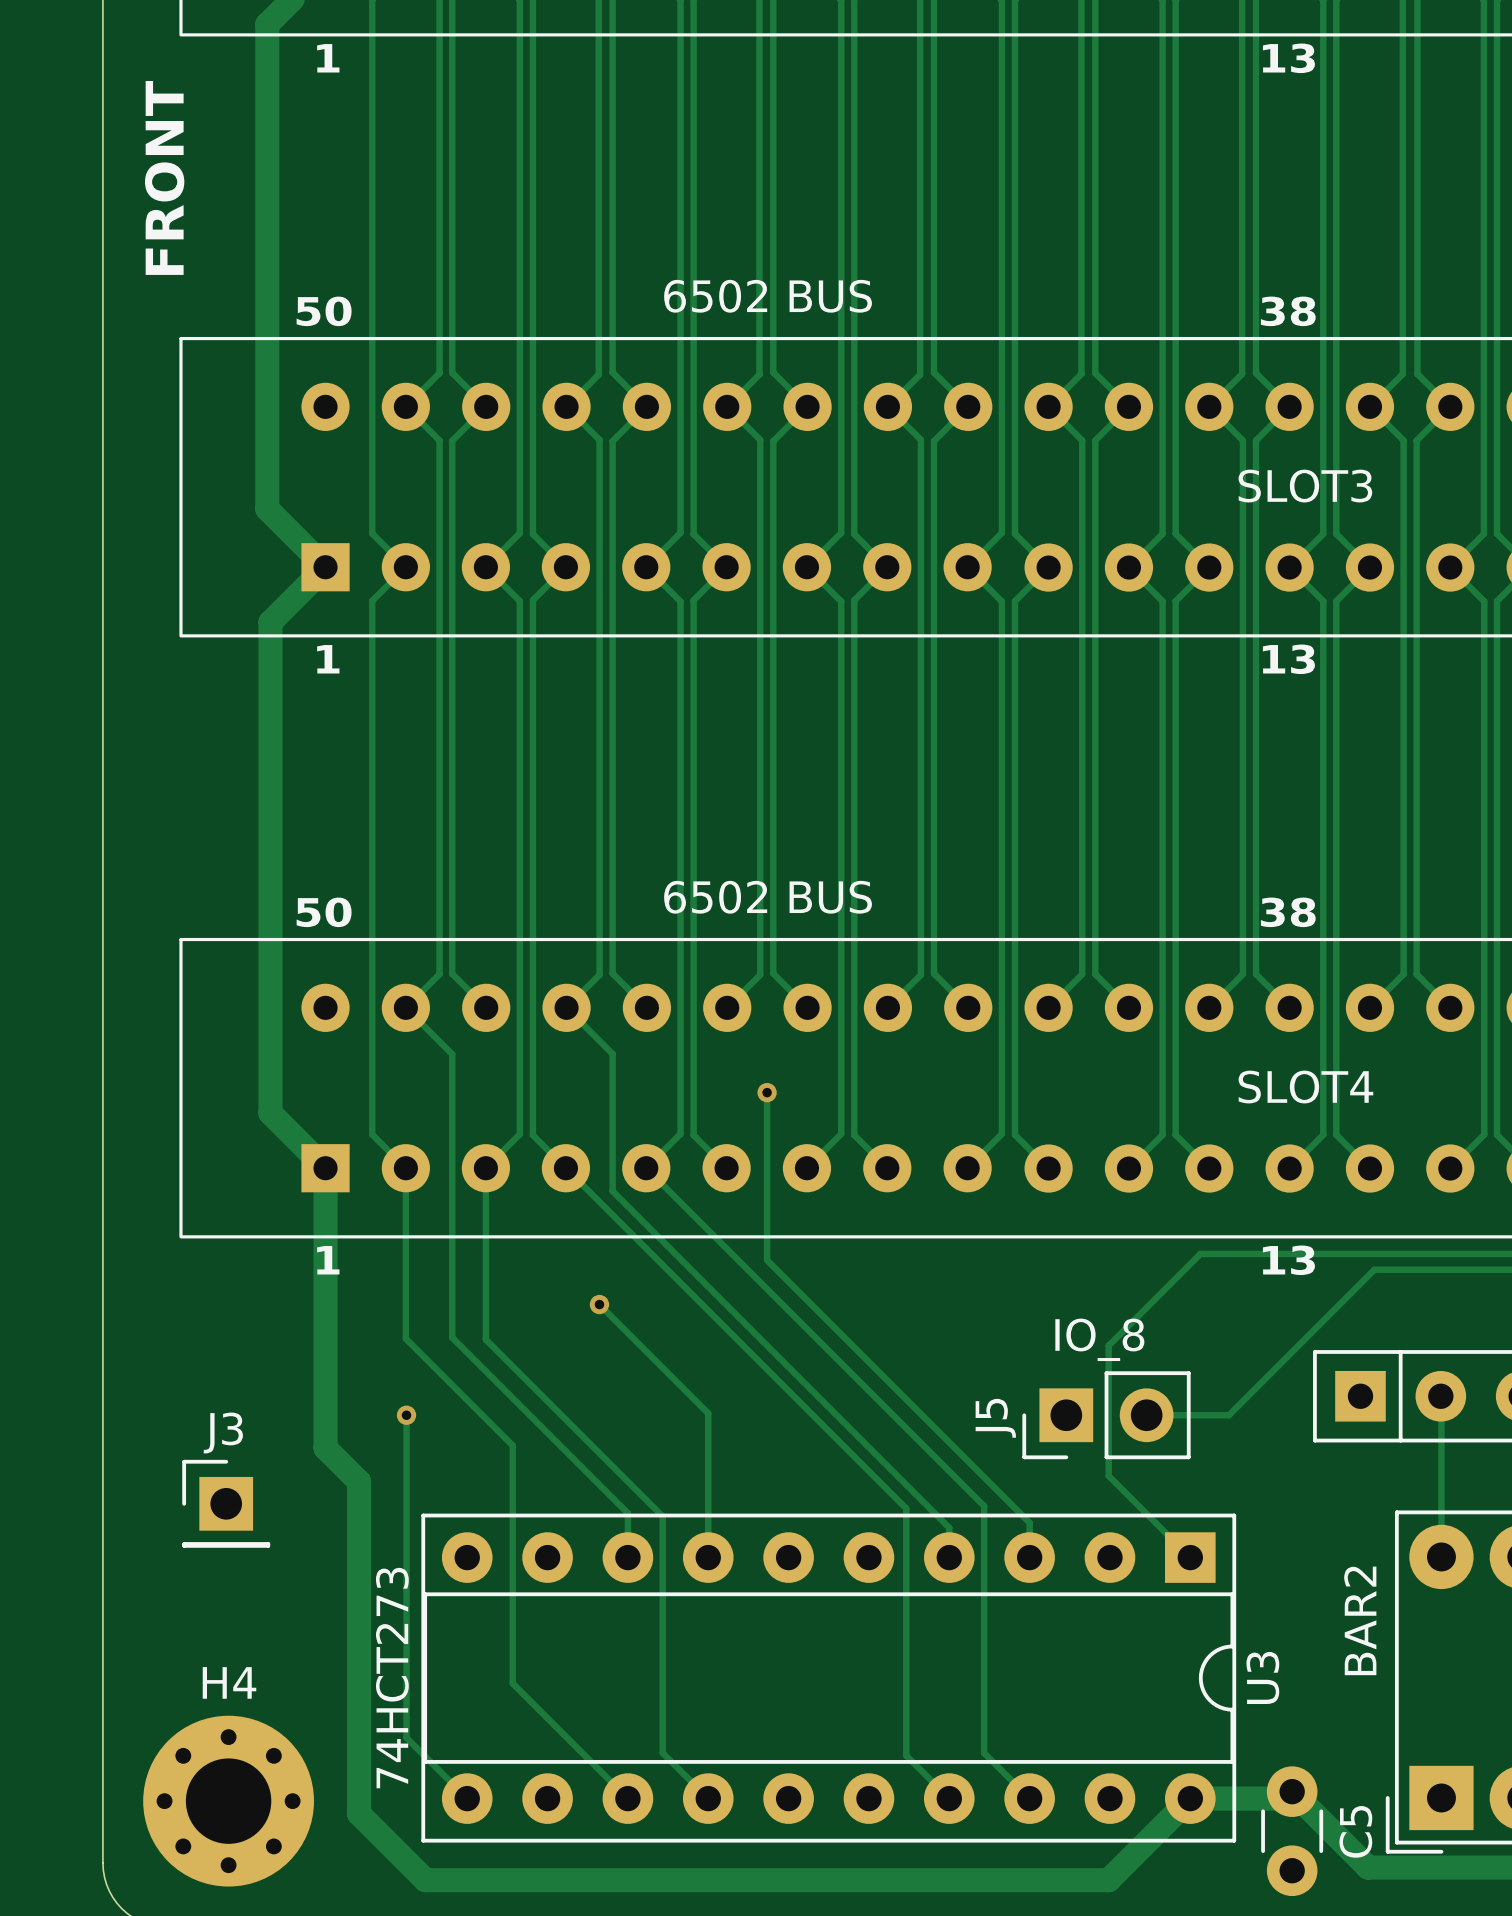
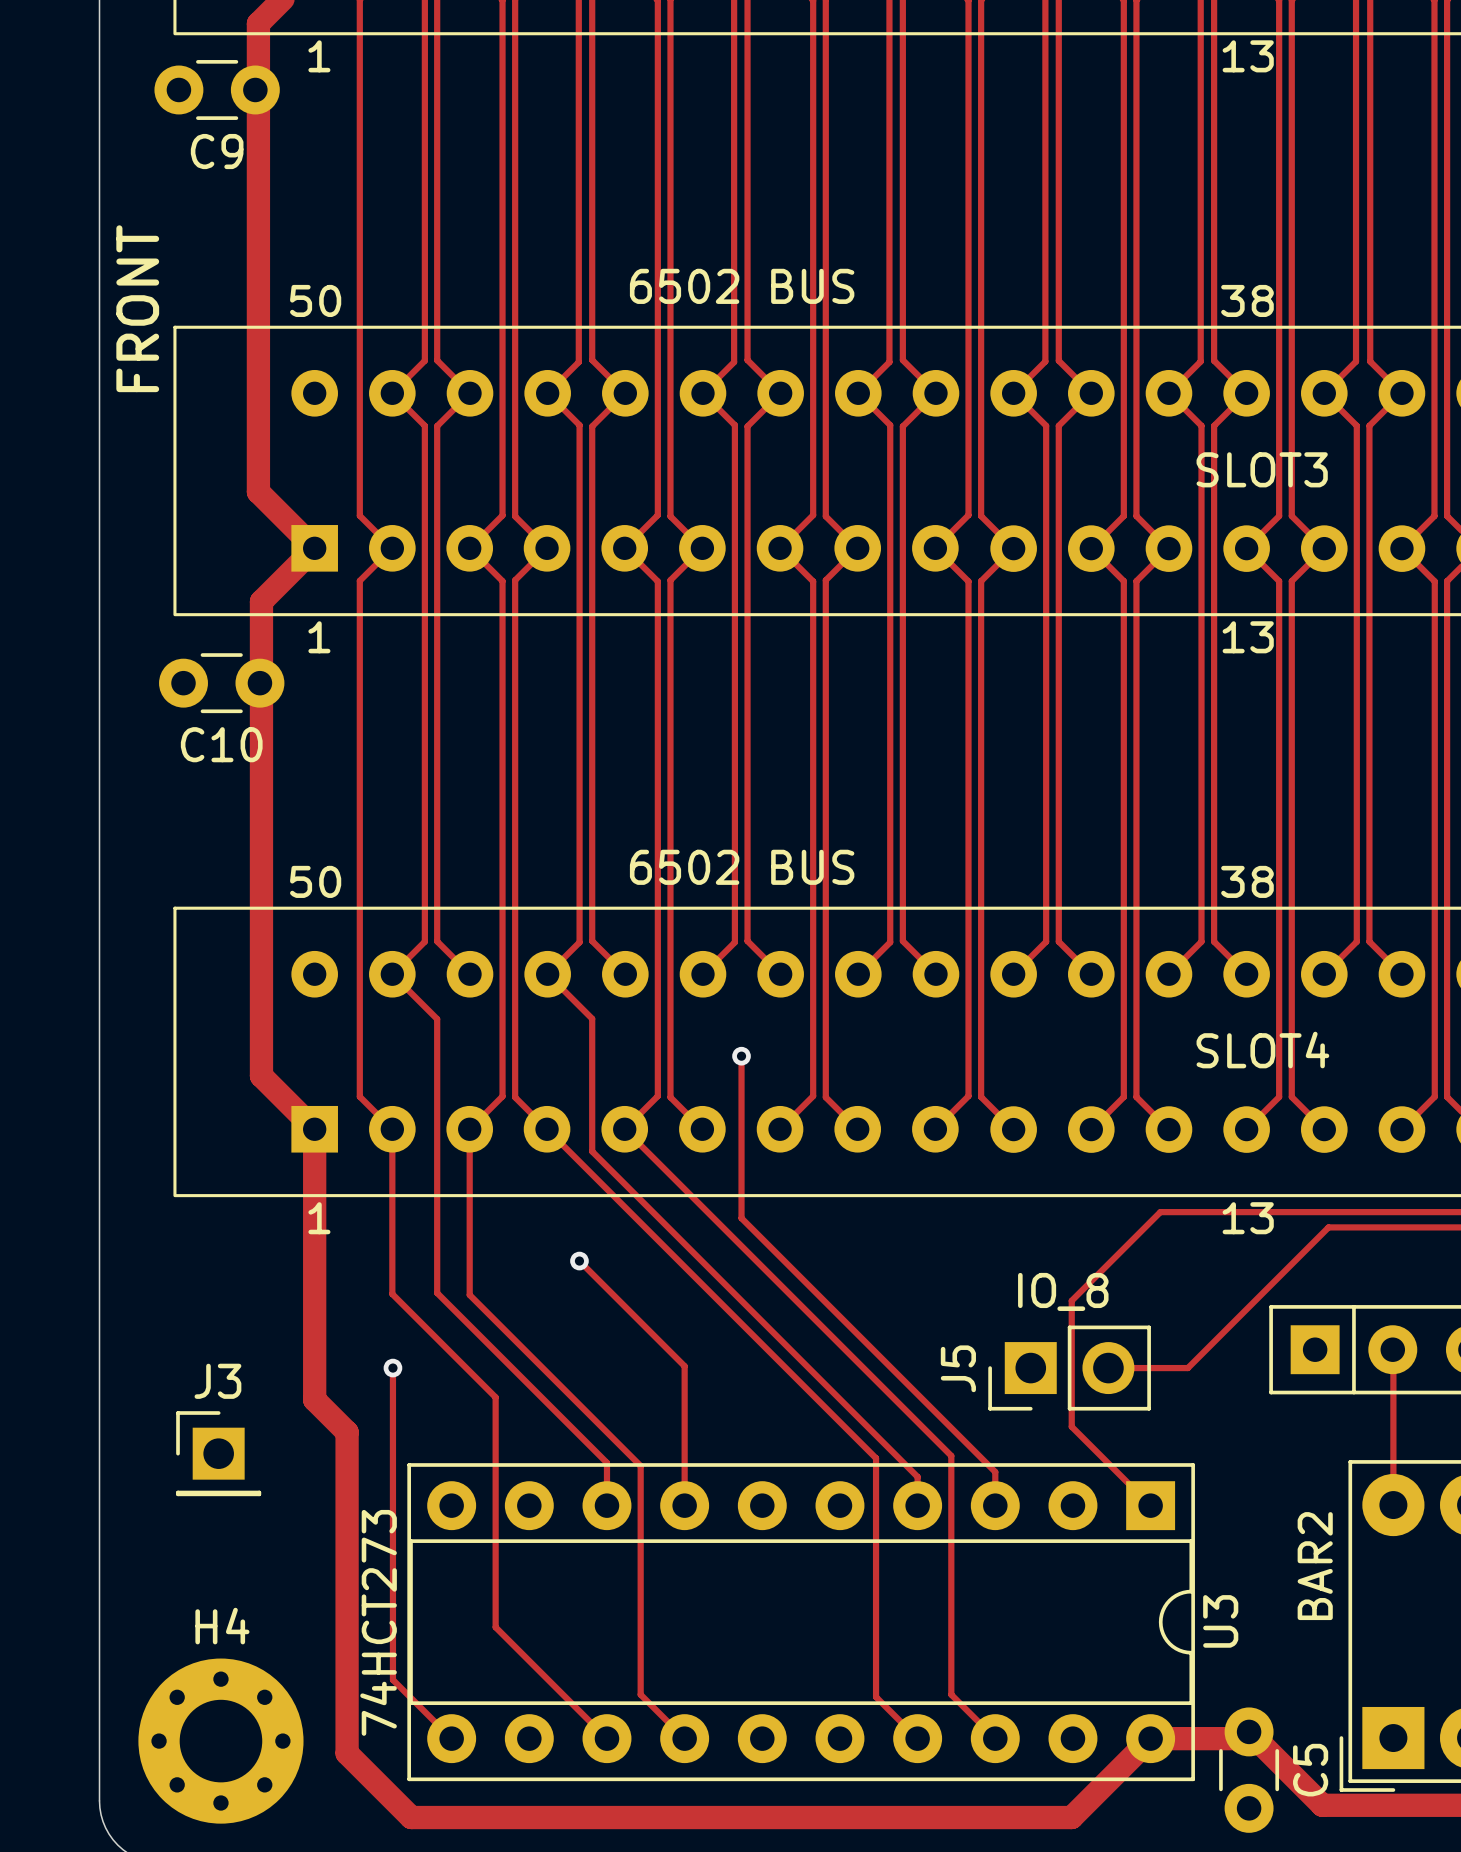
C9: none -> (217, 89)
text position: FRONT (164, 177) -> FRONT (137, 308)
C10: none -> (221, 683)

